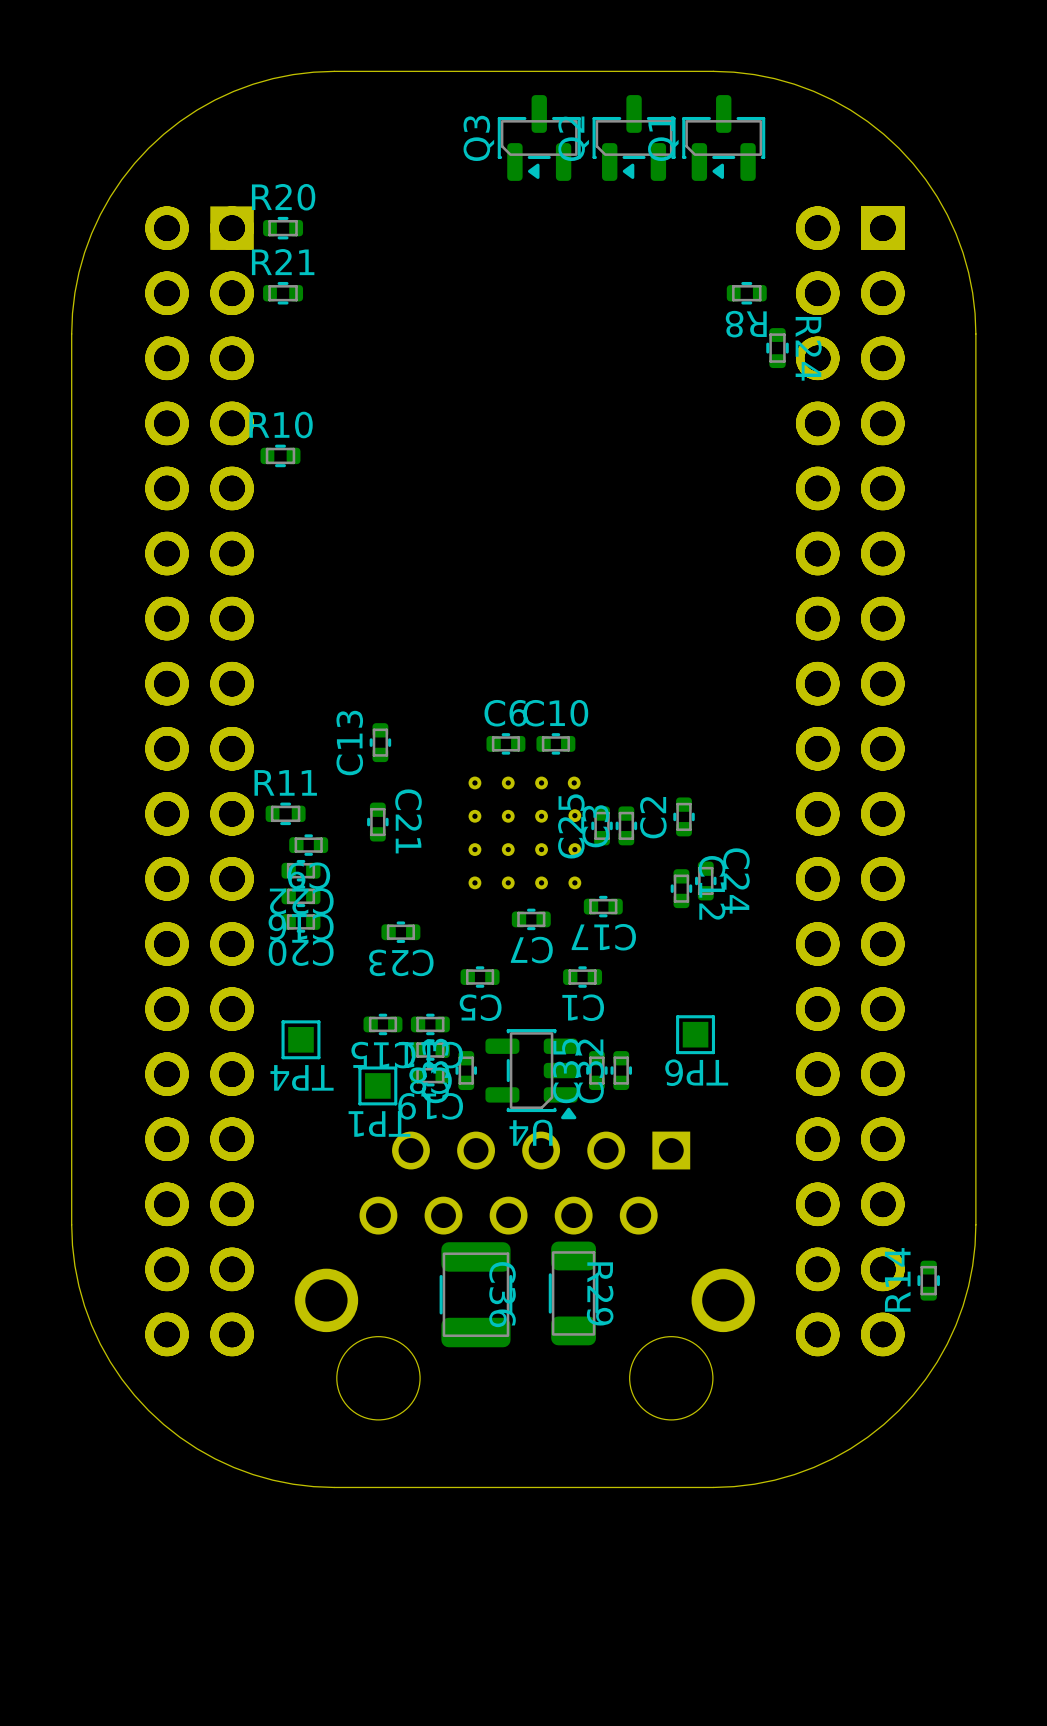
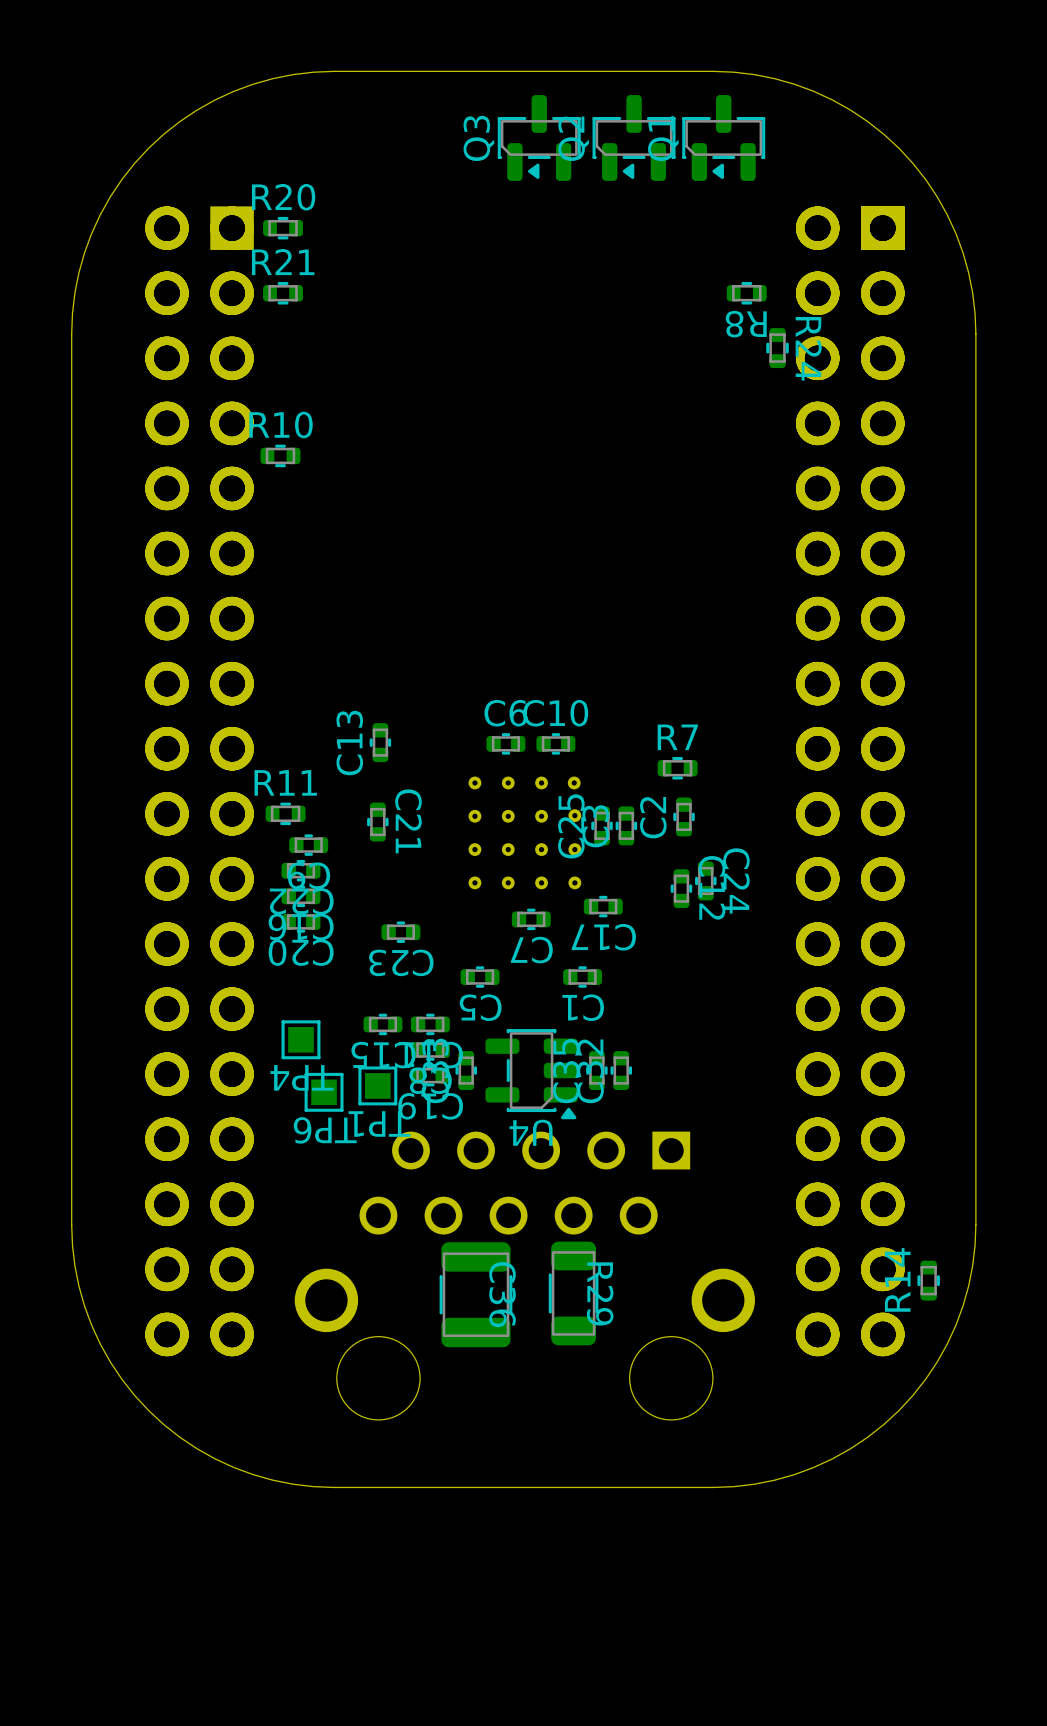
R7: none -> (677, 768)
TP6 position: (695, 1034) -> (324, 1092)

